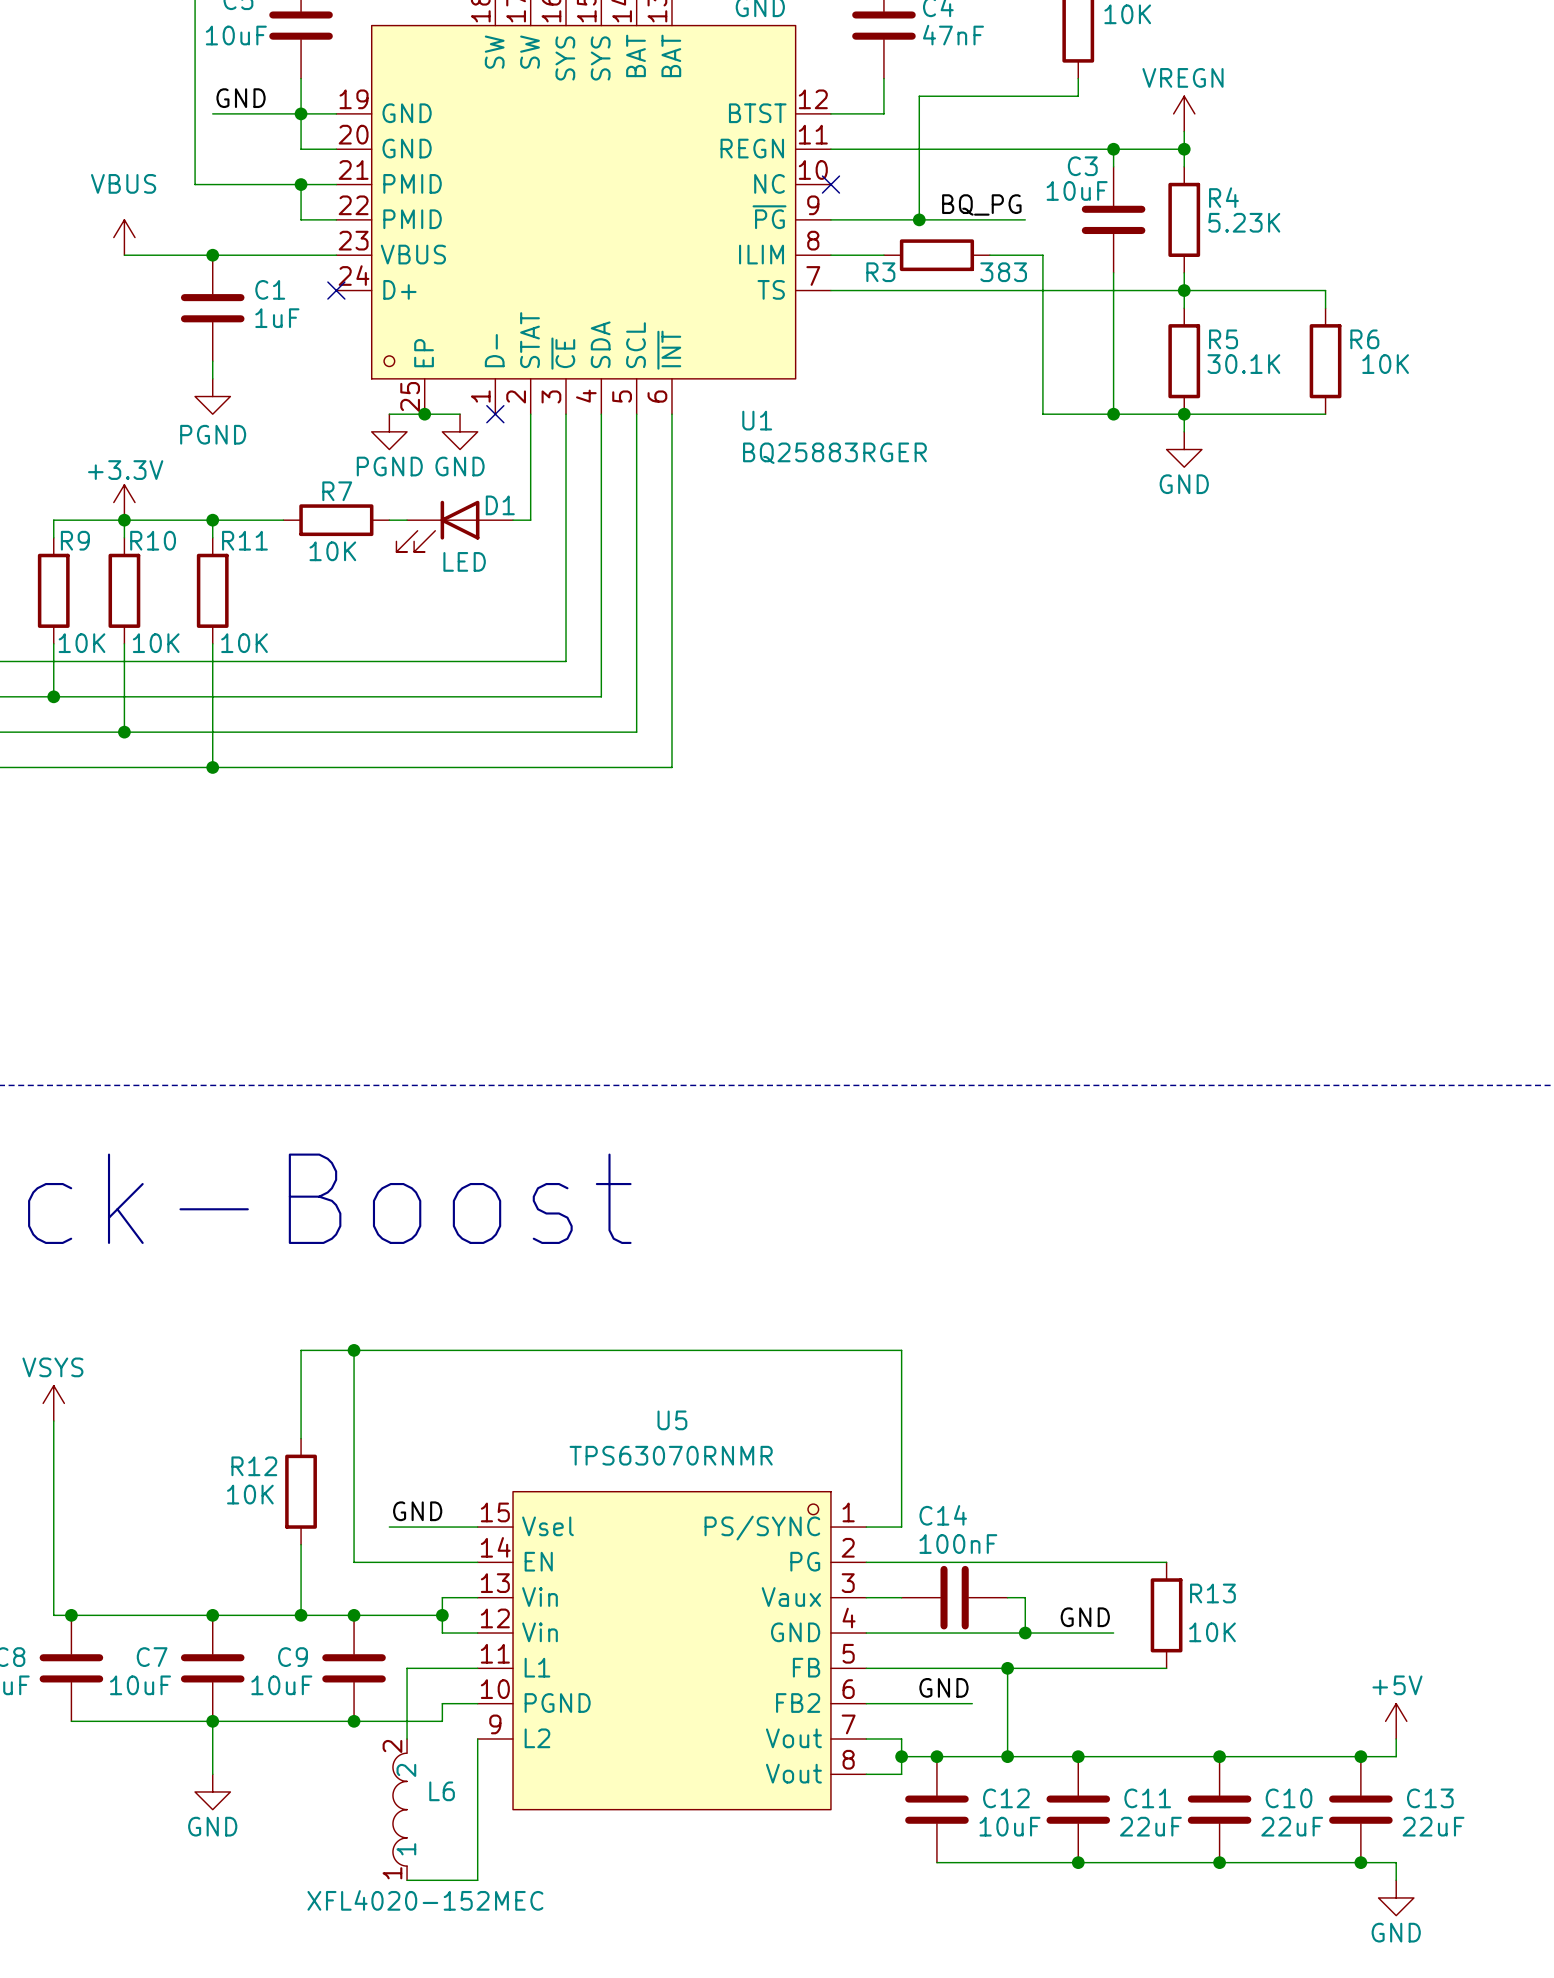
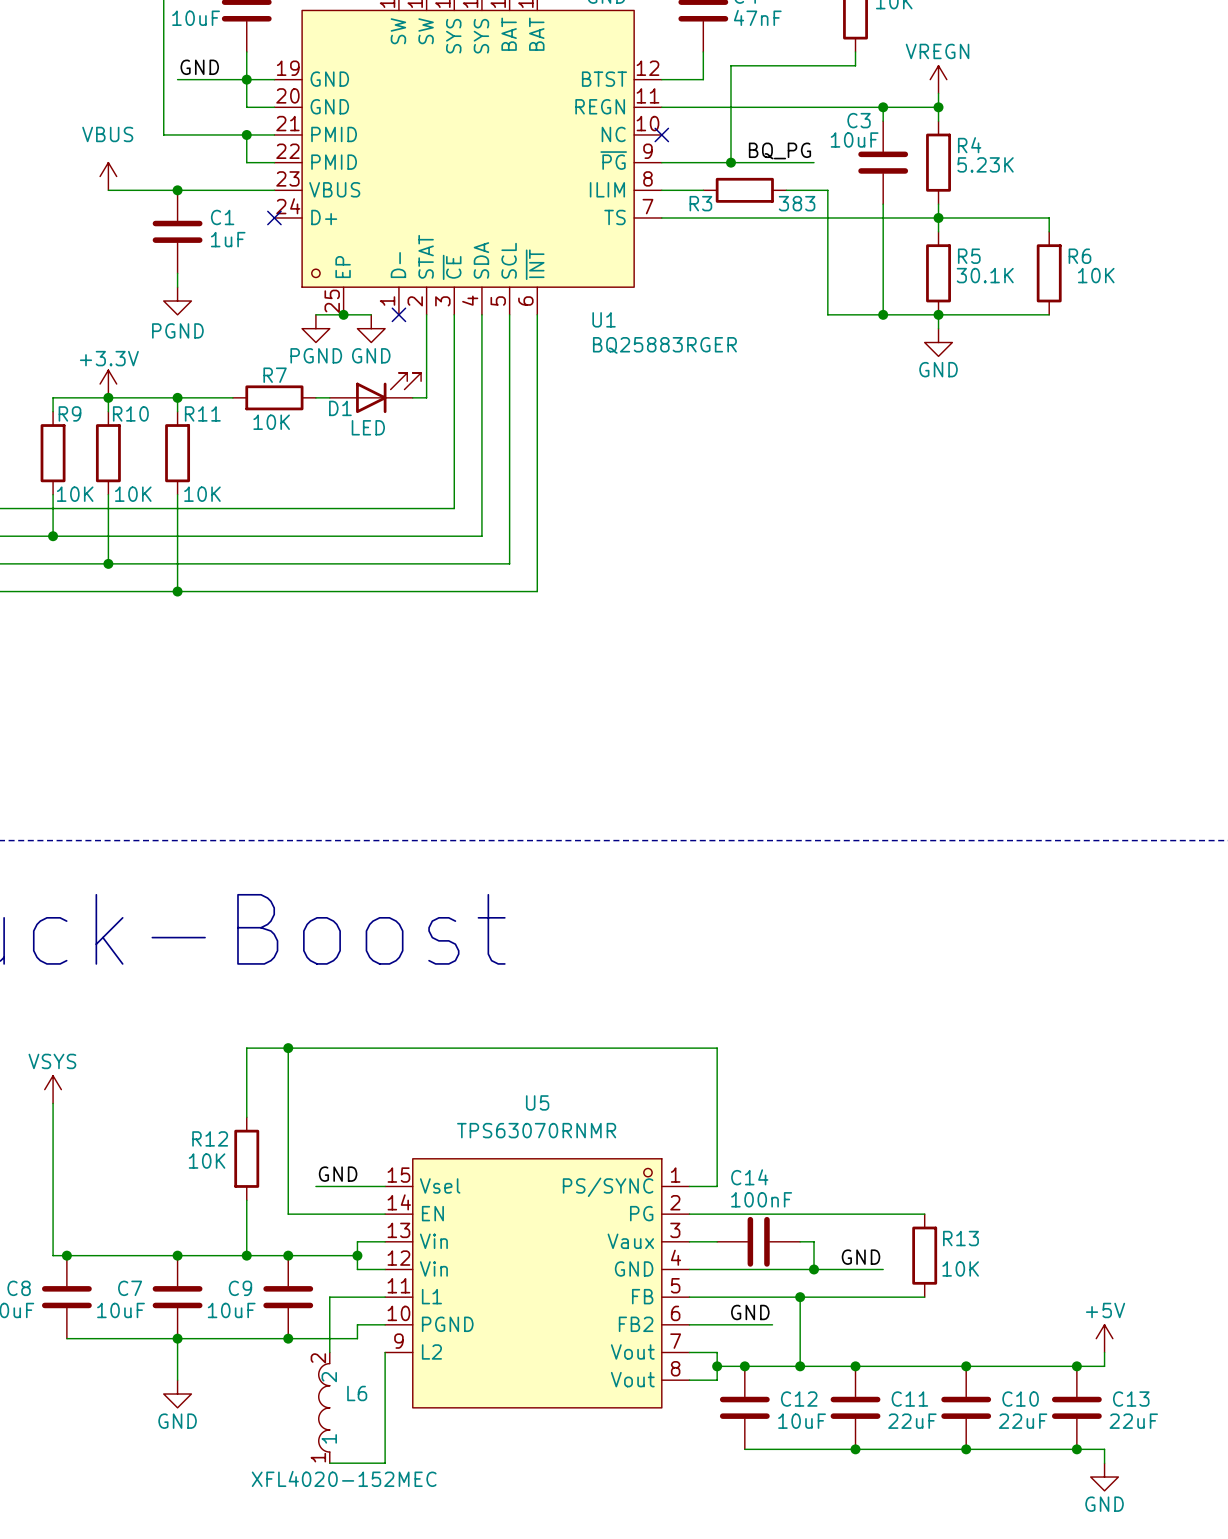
D1 rotation: 0° (437, 526) -> 180° (388, 393)
D1 value position: LED (464, 561) -> LED (368, 427)

